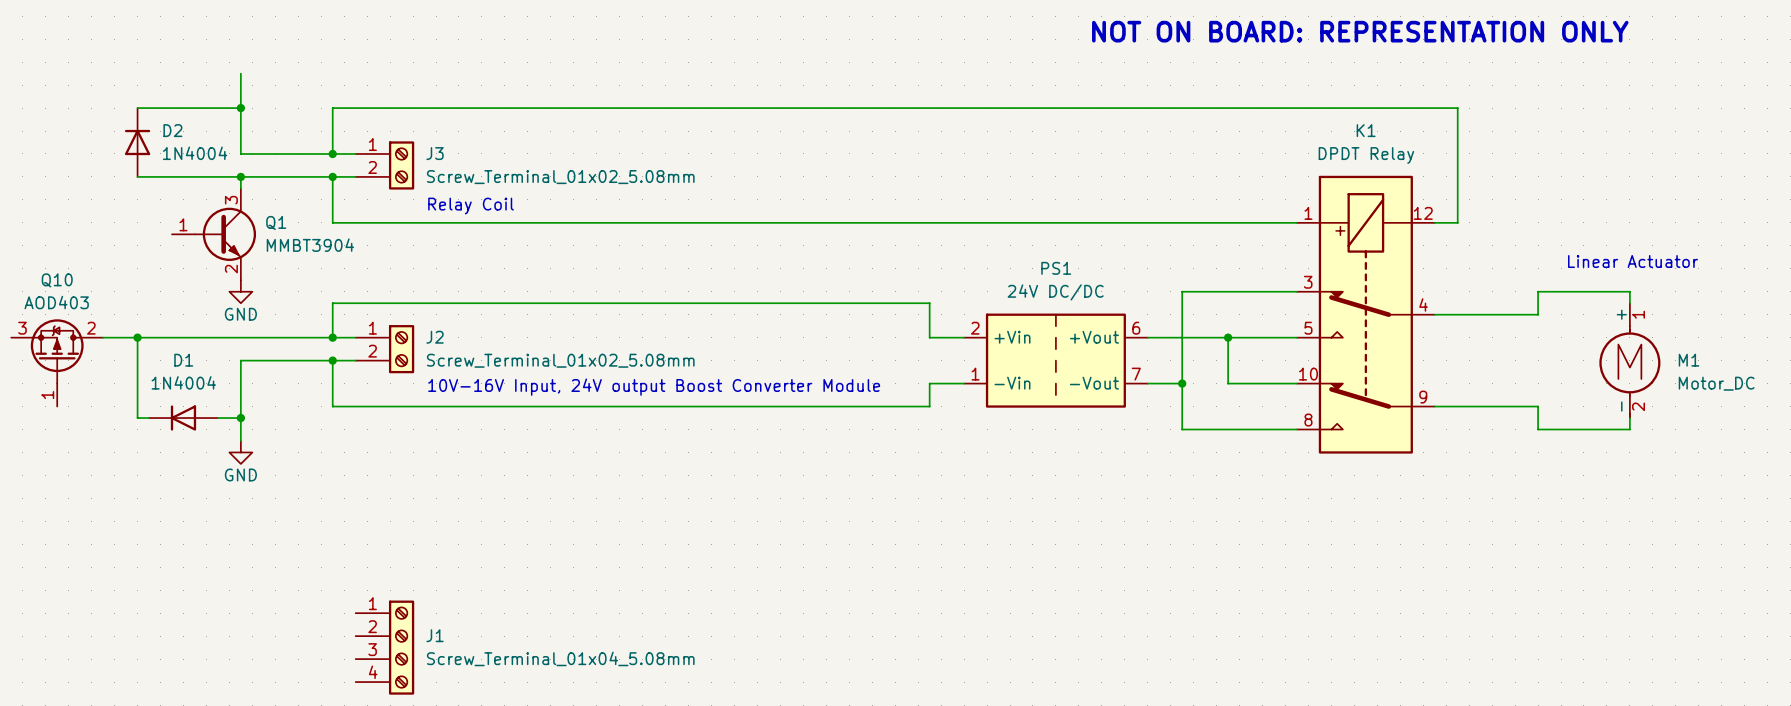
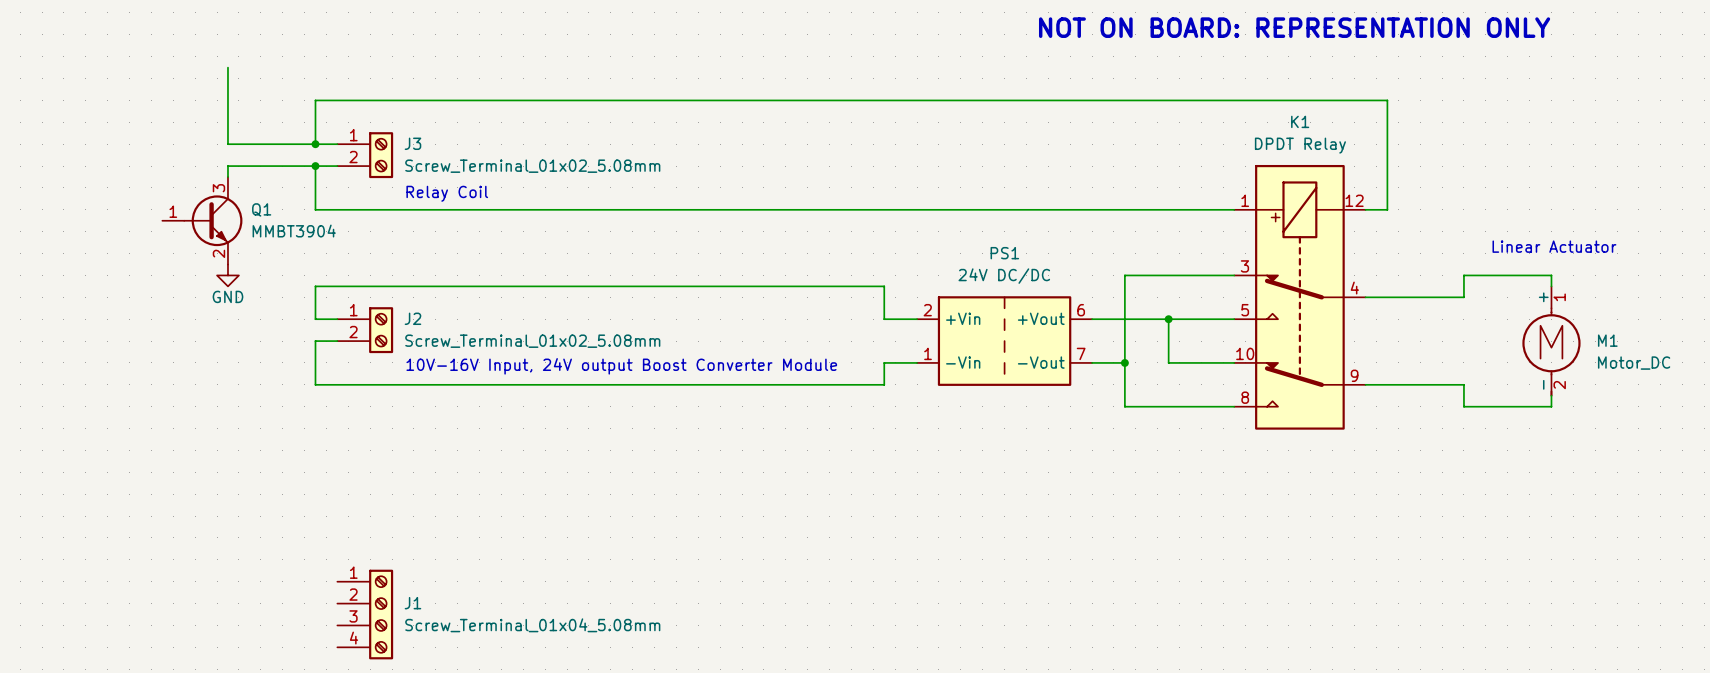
wire: (137, 108) (240, 108) -> none
junction: (240, 108) -> none
D2: 1N4004 (137, 142) -> none
wire: (137, 176) (240, 176) -> none
junction: (240, 176) -> none
wire: (103, 337) (332, 337) -> none
wire: (137, 337) (137, 418) (149, 418) -> none
junction: (137, 337) -> none
junction: (332, 337) -> none
wire: (332, 360) (240, 360) (240, 440) -> none
junction: (332, 360) -> none
Q10: AOD403 (57, 362) -> none
D1: 1N4004 (183, 418) -> none
wire: (217, 418) (240, 418) -> none
junction: (240, 418) -> none
power symbol: GND (240, 452) -> none

